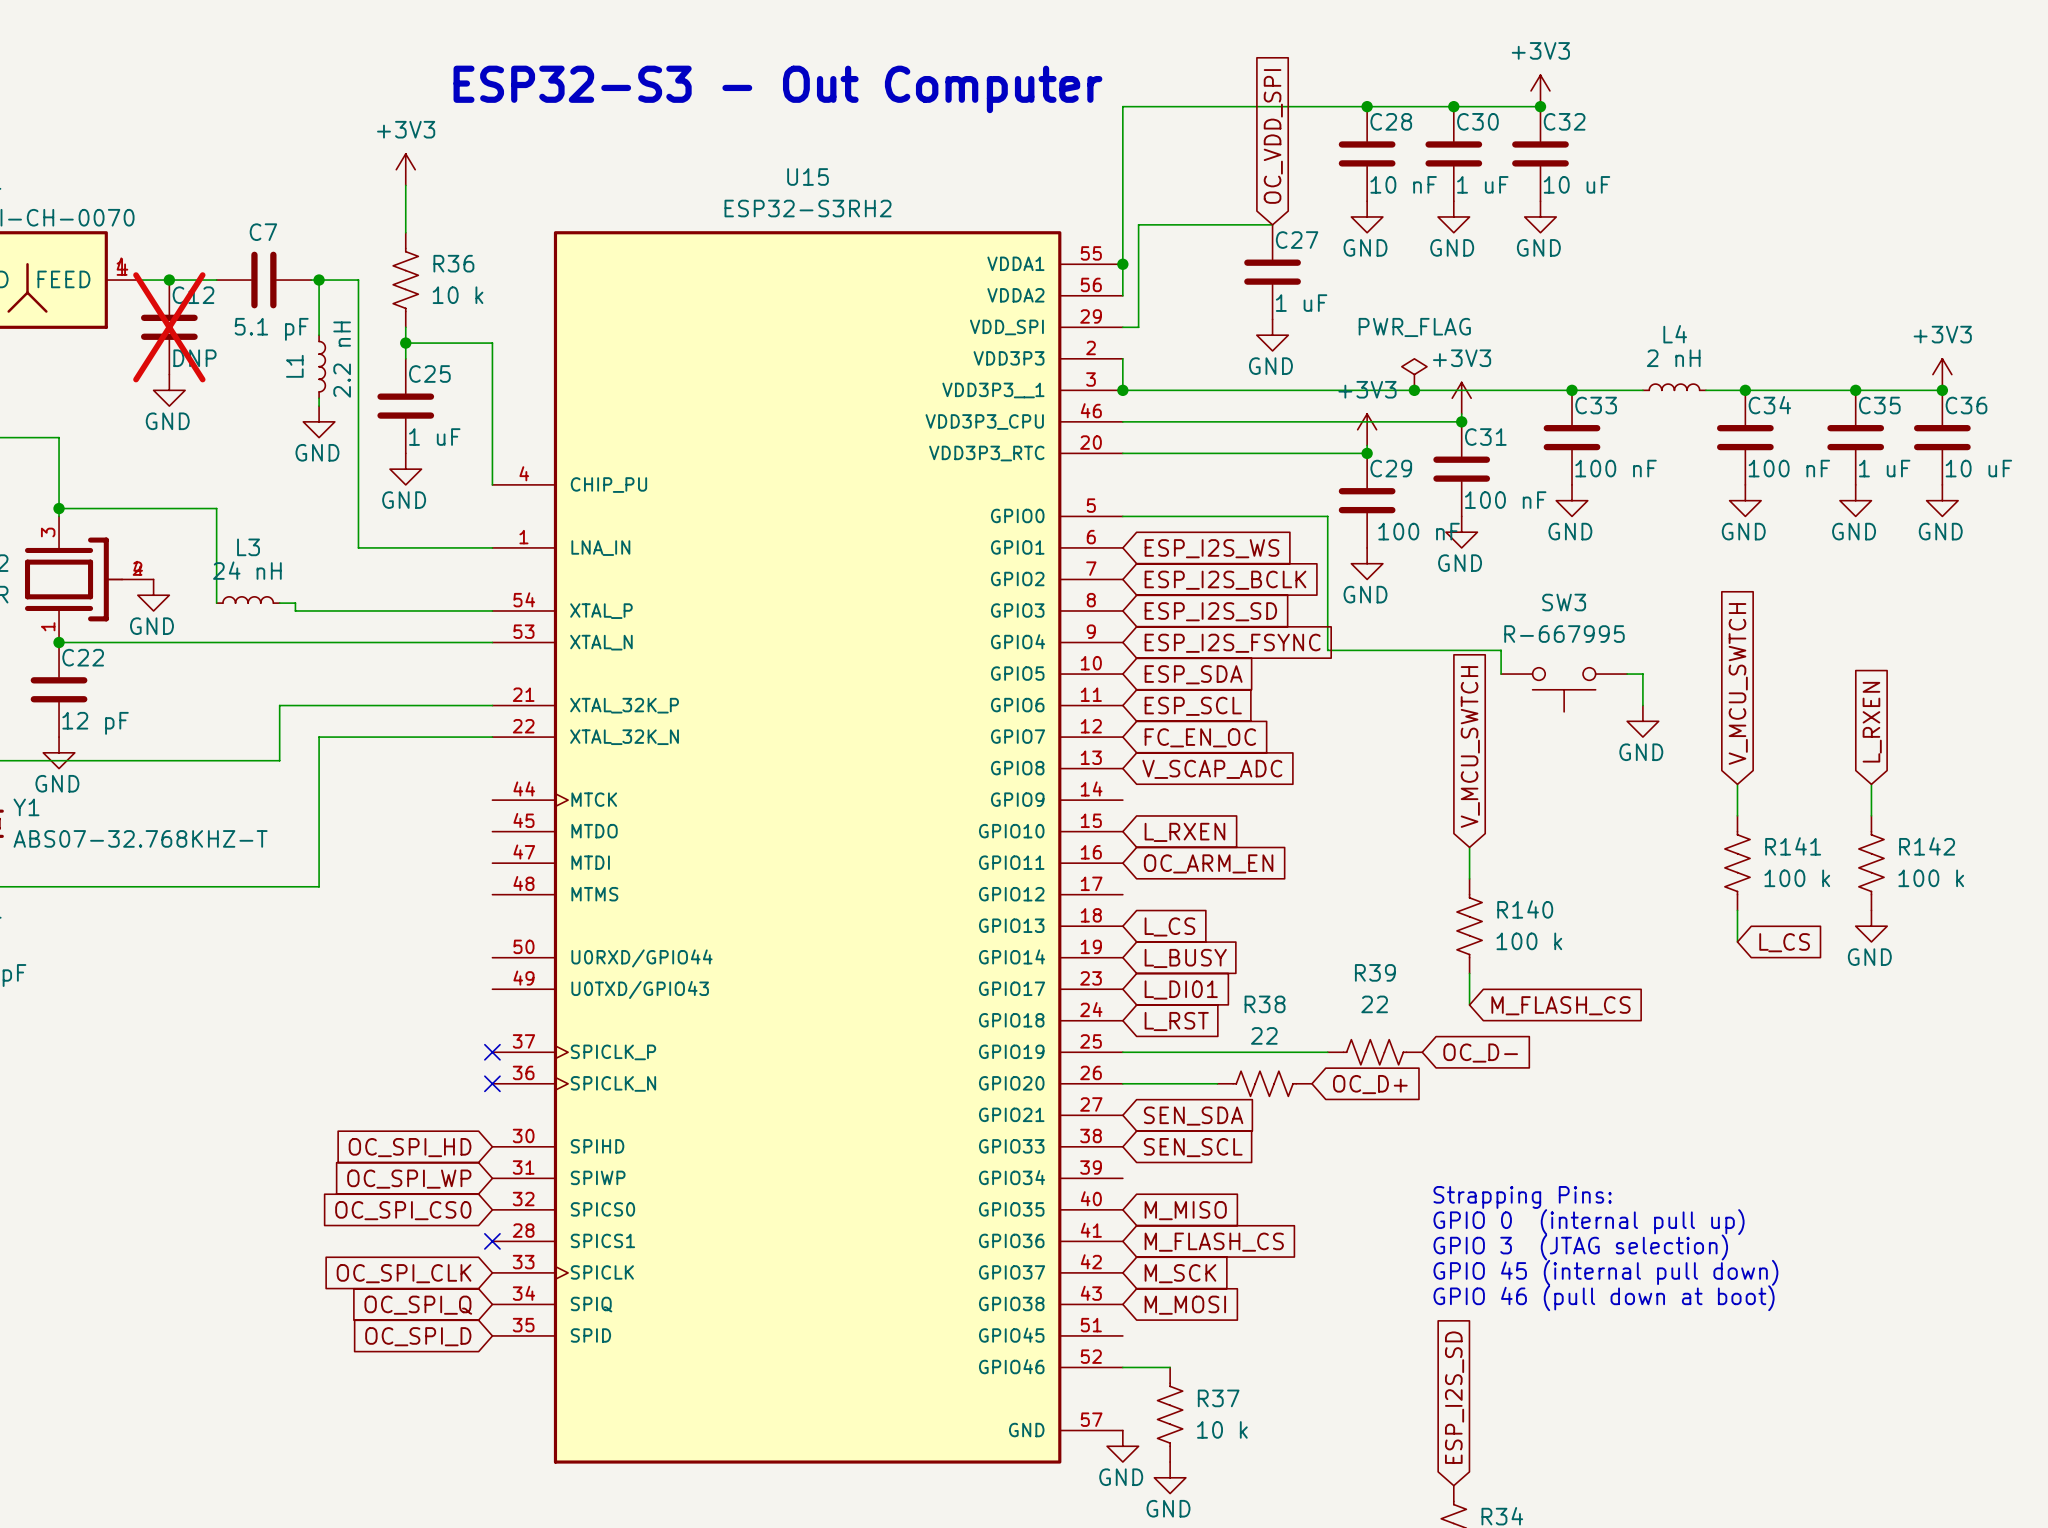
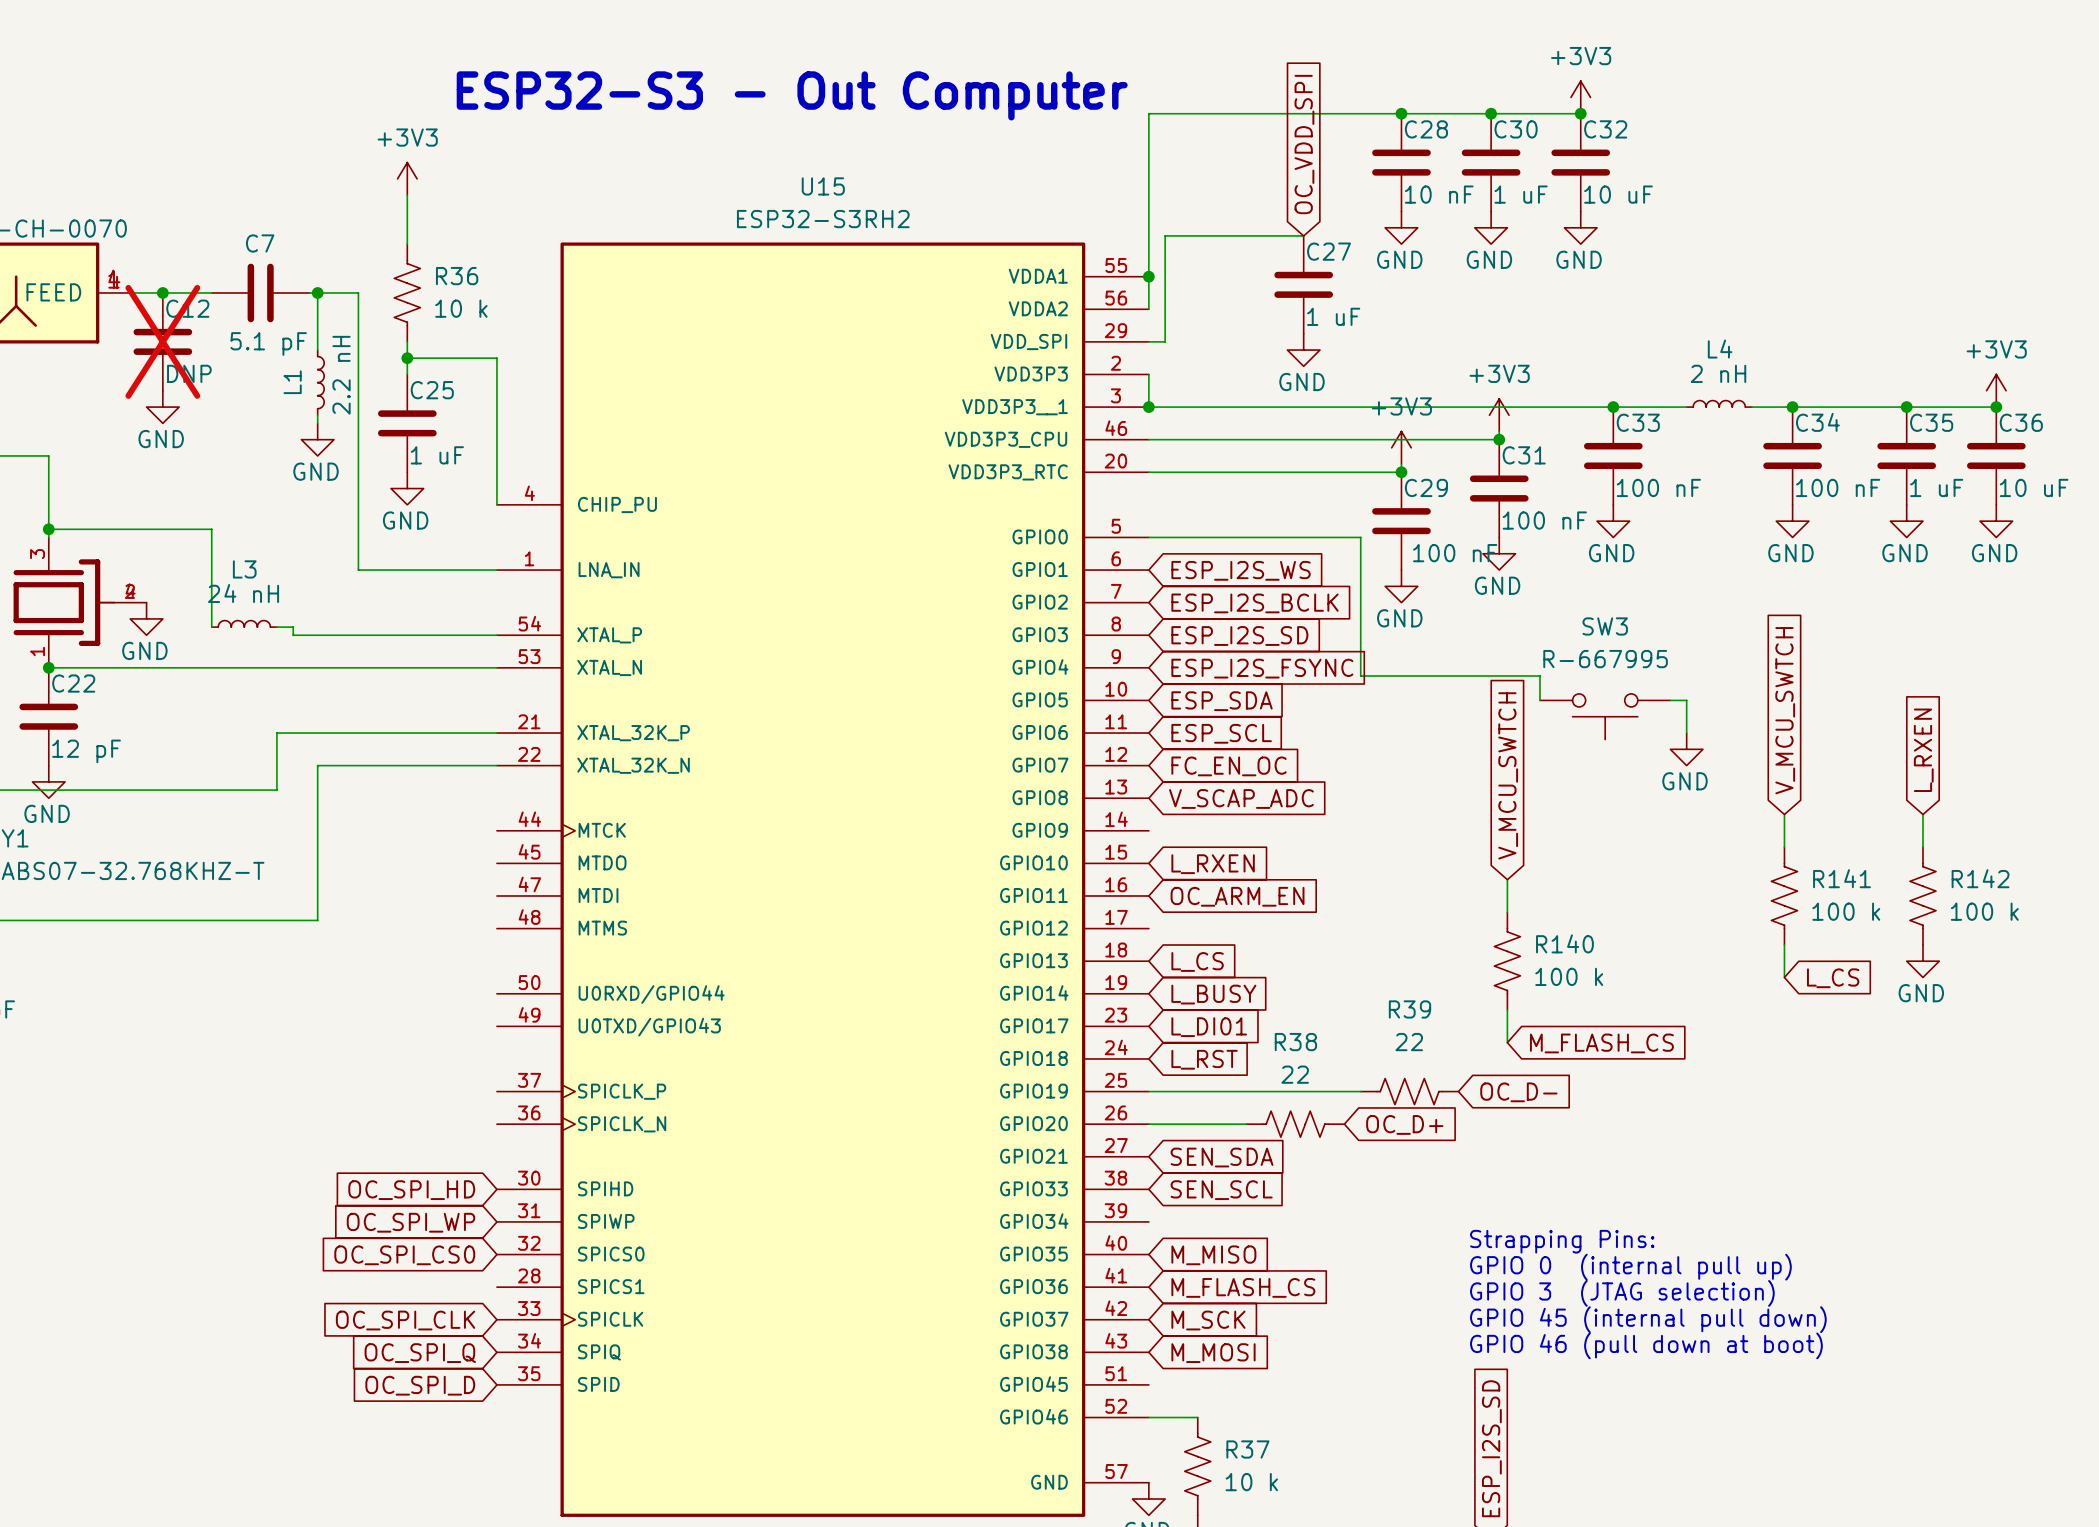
power symbol: PWR_FLAG (1414, 374) -> none
junction: (1414, 390) -> none
no-connect mark: (492, 1052) -> none
no-connect mark: (492, 1083) -> none
no-connect mark: (492, 1241) -> none

